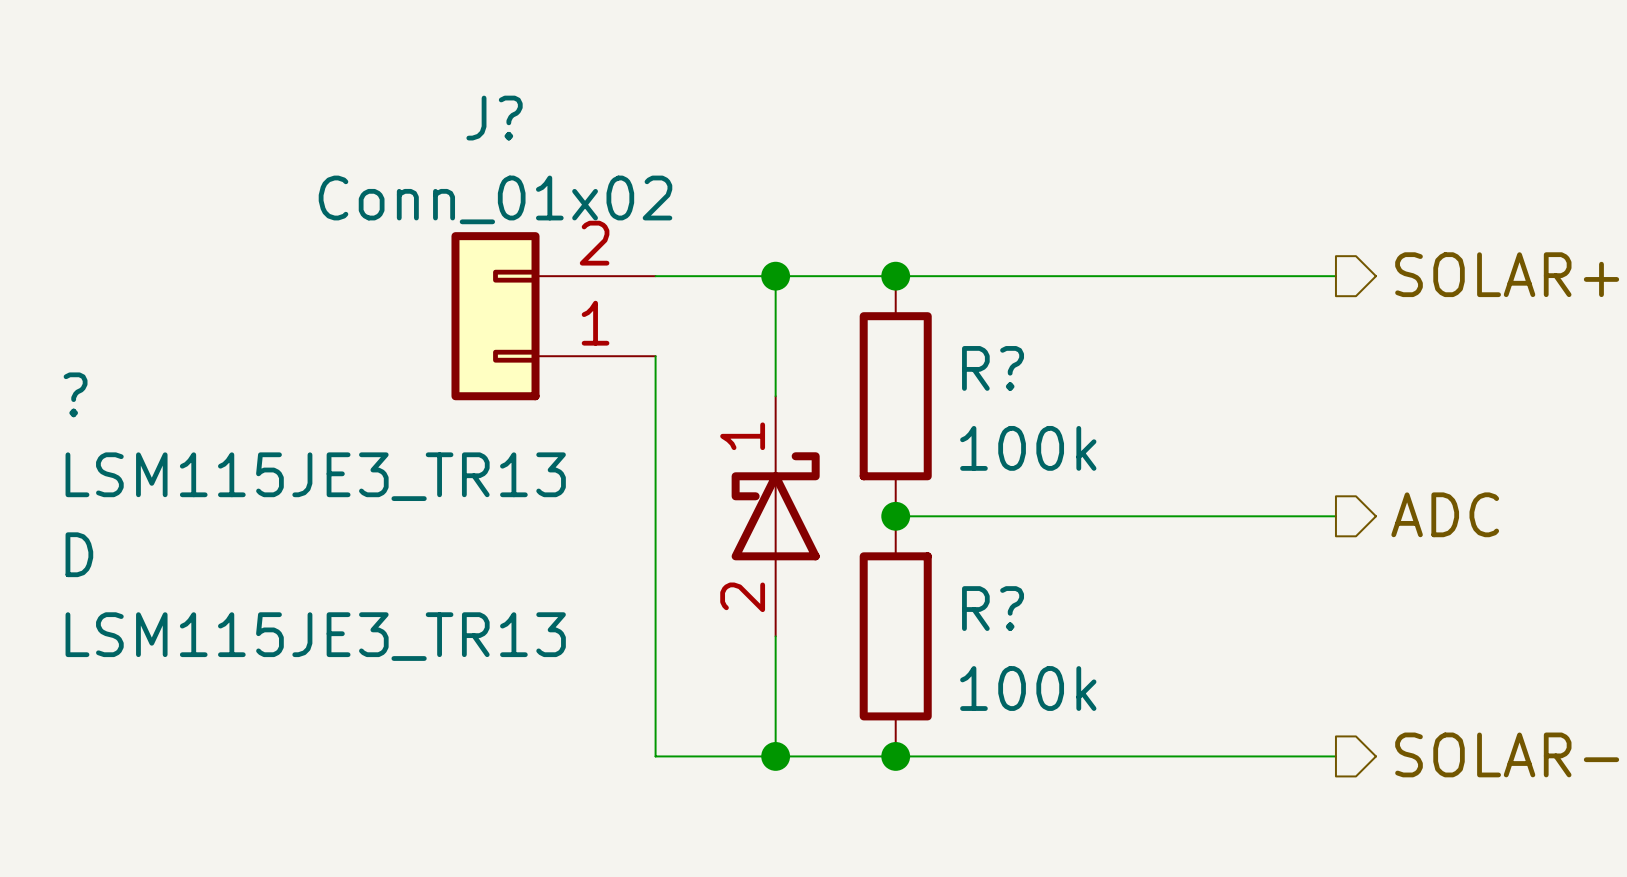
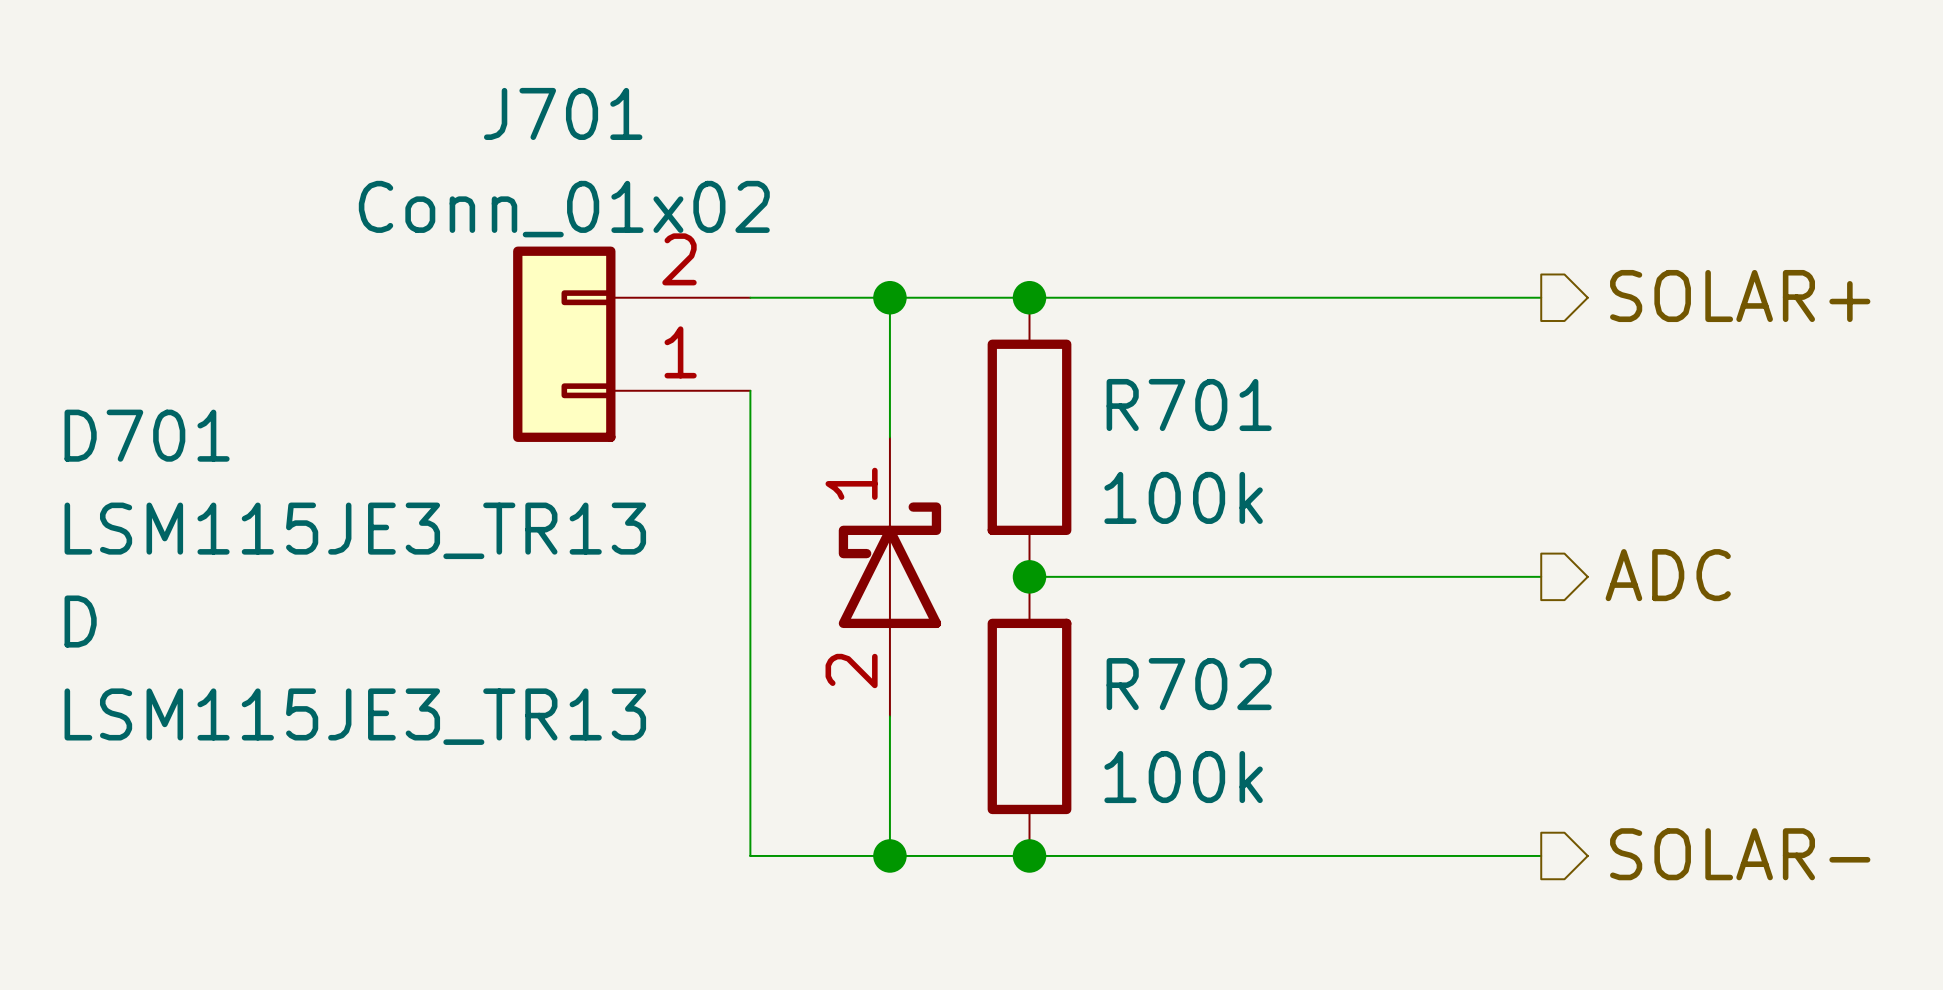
J? name: J? (494, 118) -> J701 (563, 113)
R? name: R? (993, 368) -> R701 (1189, 404)
D701 name: ? (75, 394) -> D701 (147, 435)
R? name: R? (993, 608) -> R702 (1189, 684)

